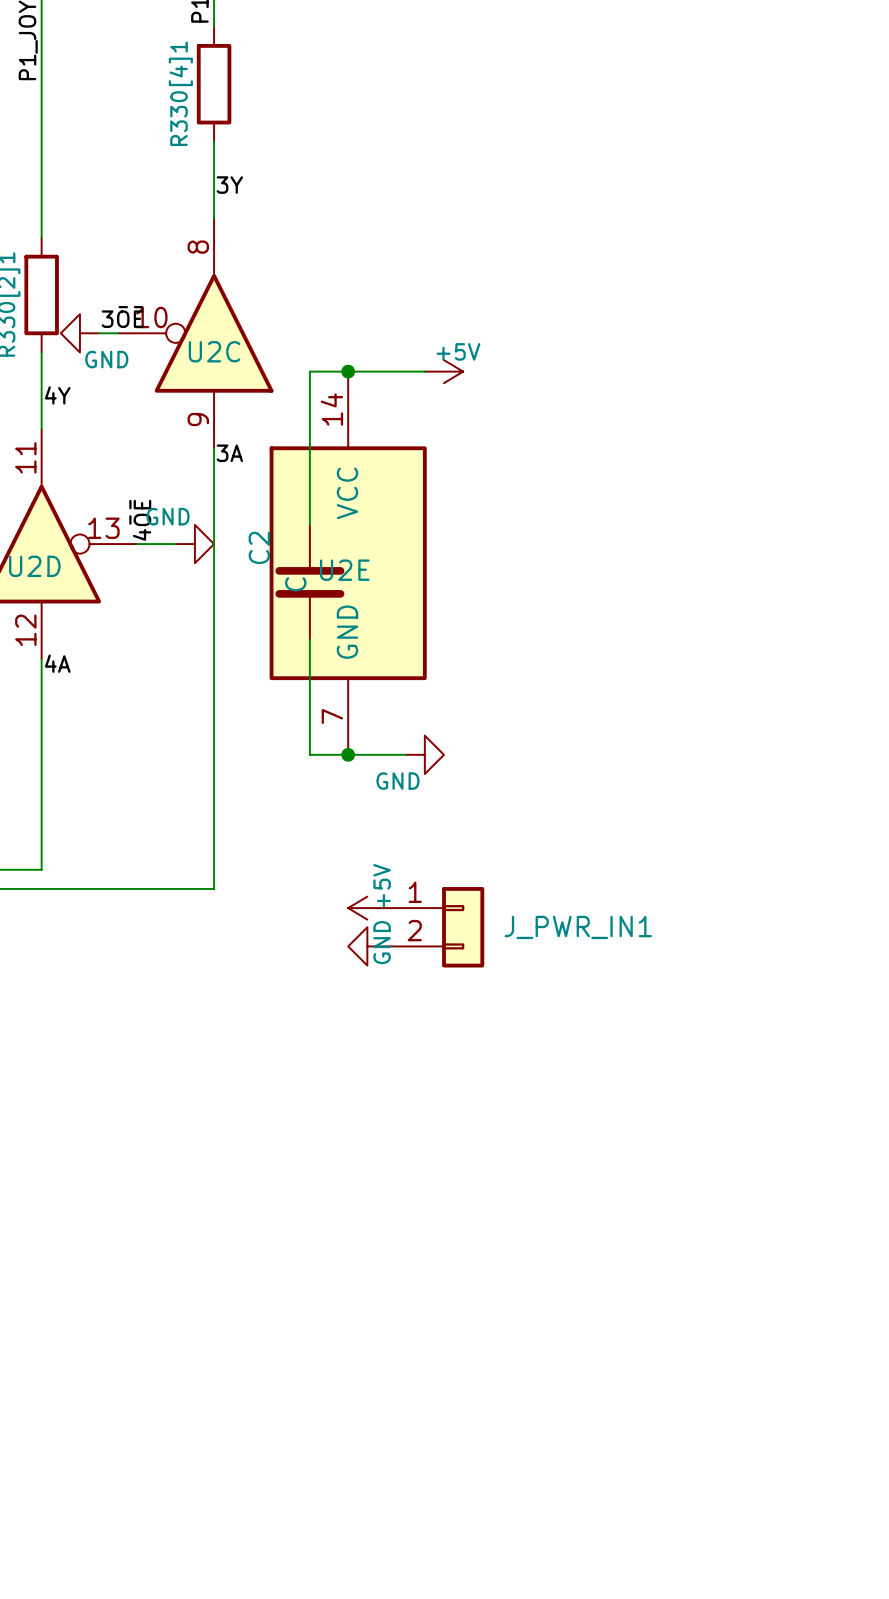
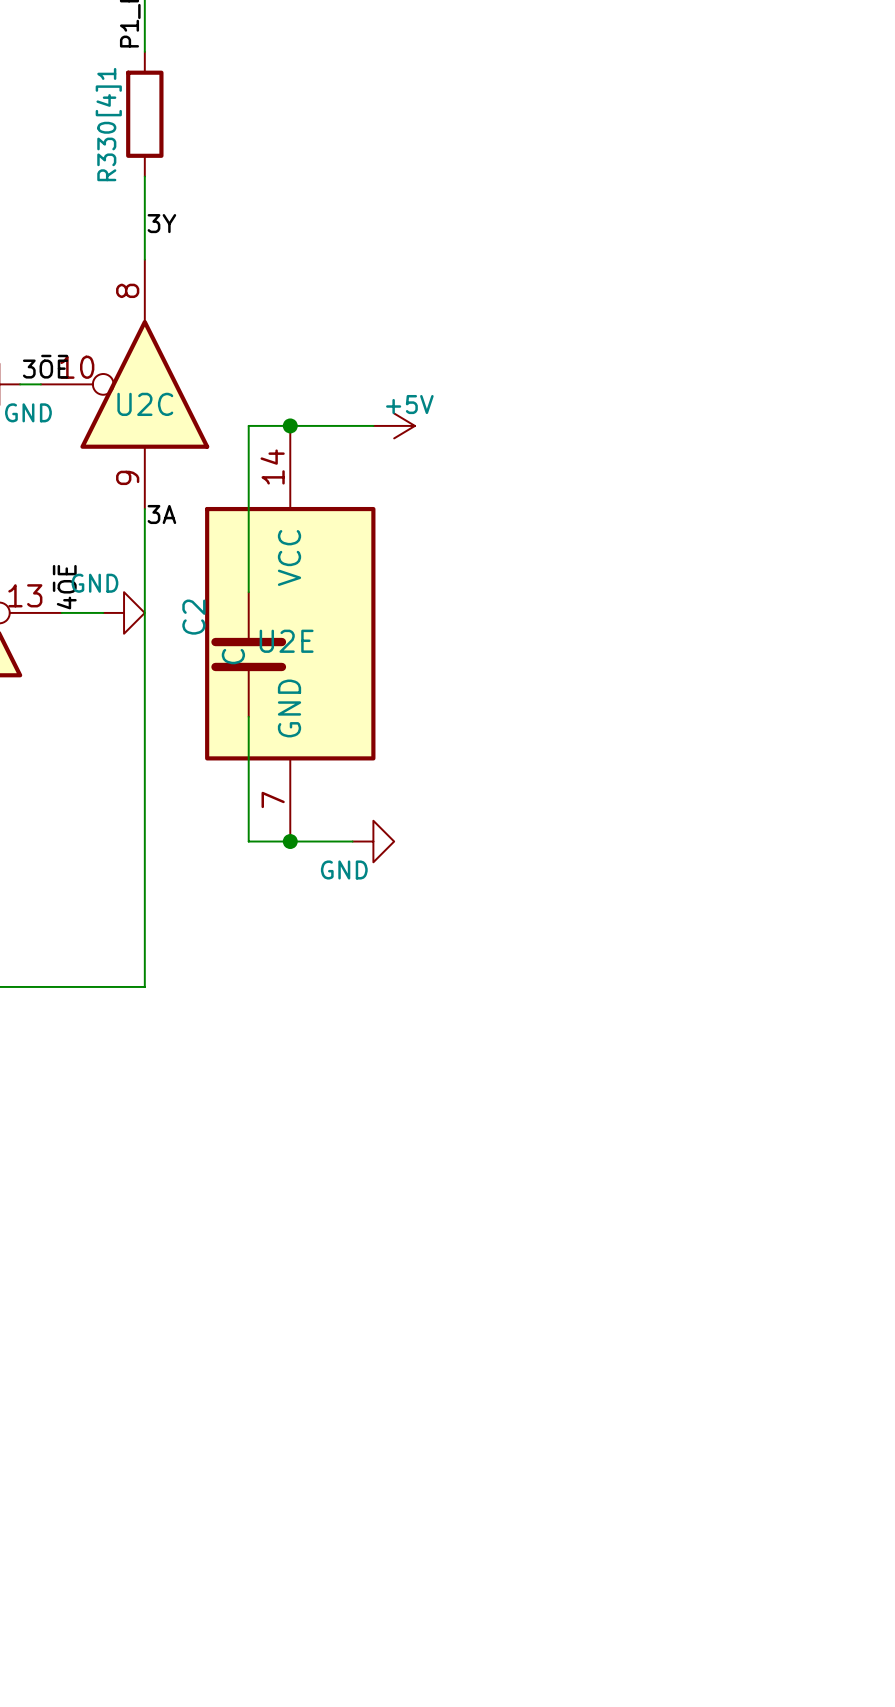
power symbol: +5V (367, 908) -> none
J_PWR_IN1: (435, 927) -> none
power symbol: GND (367, 946) -> none

